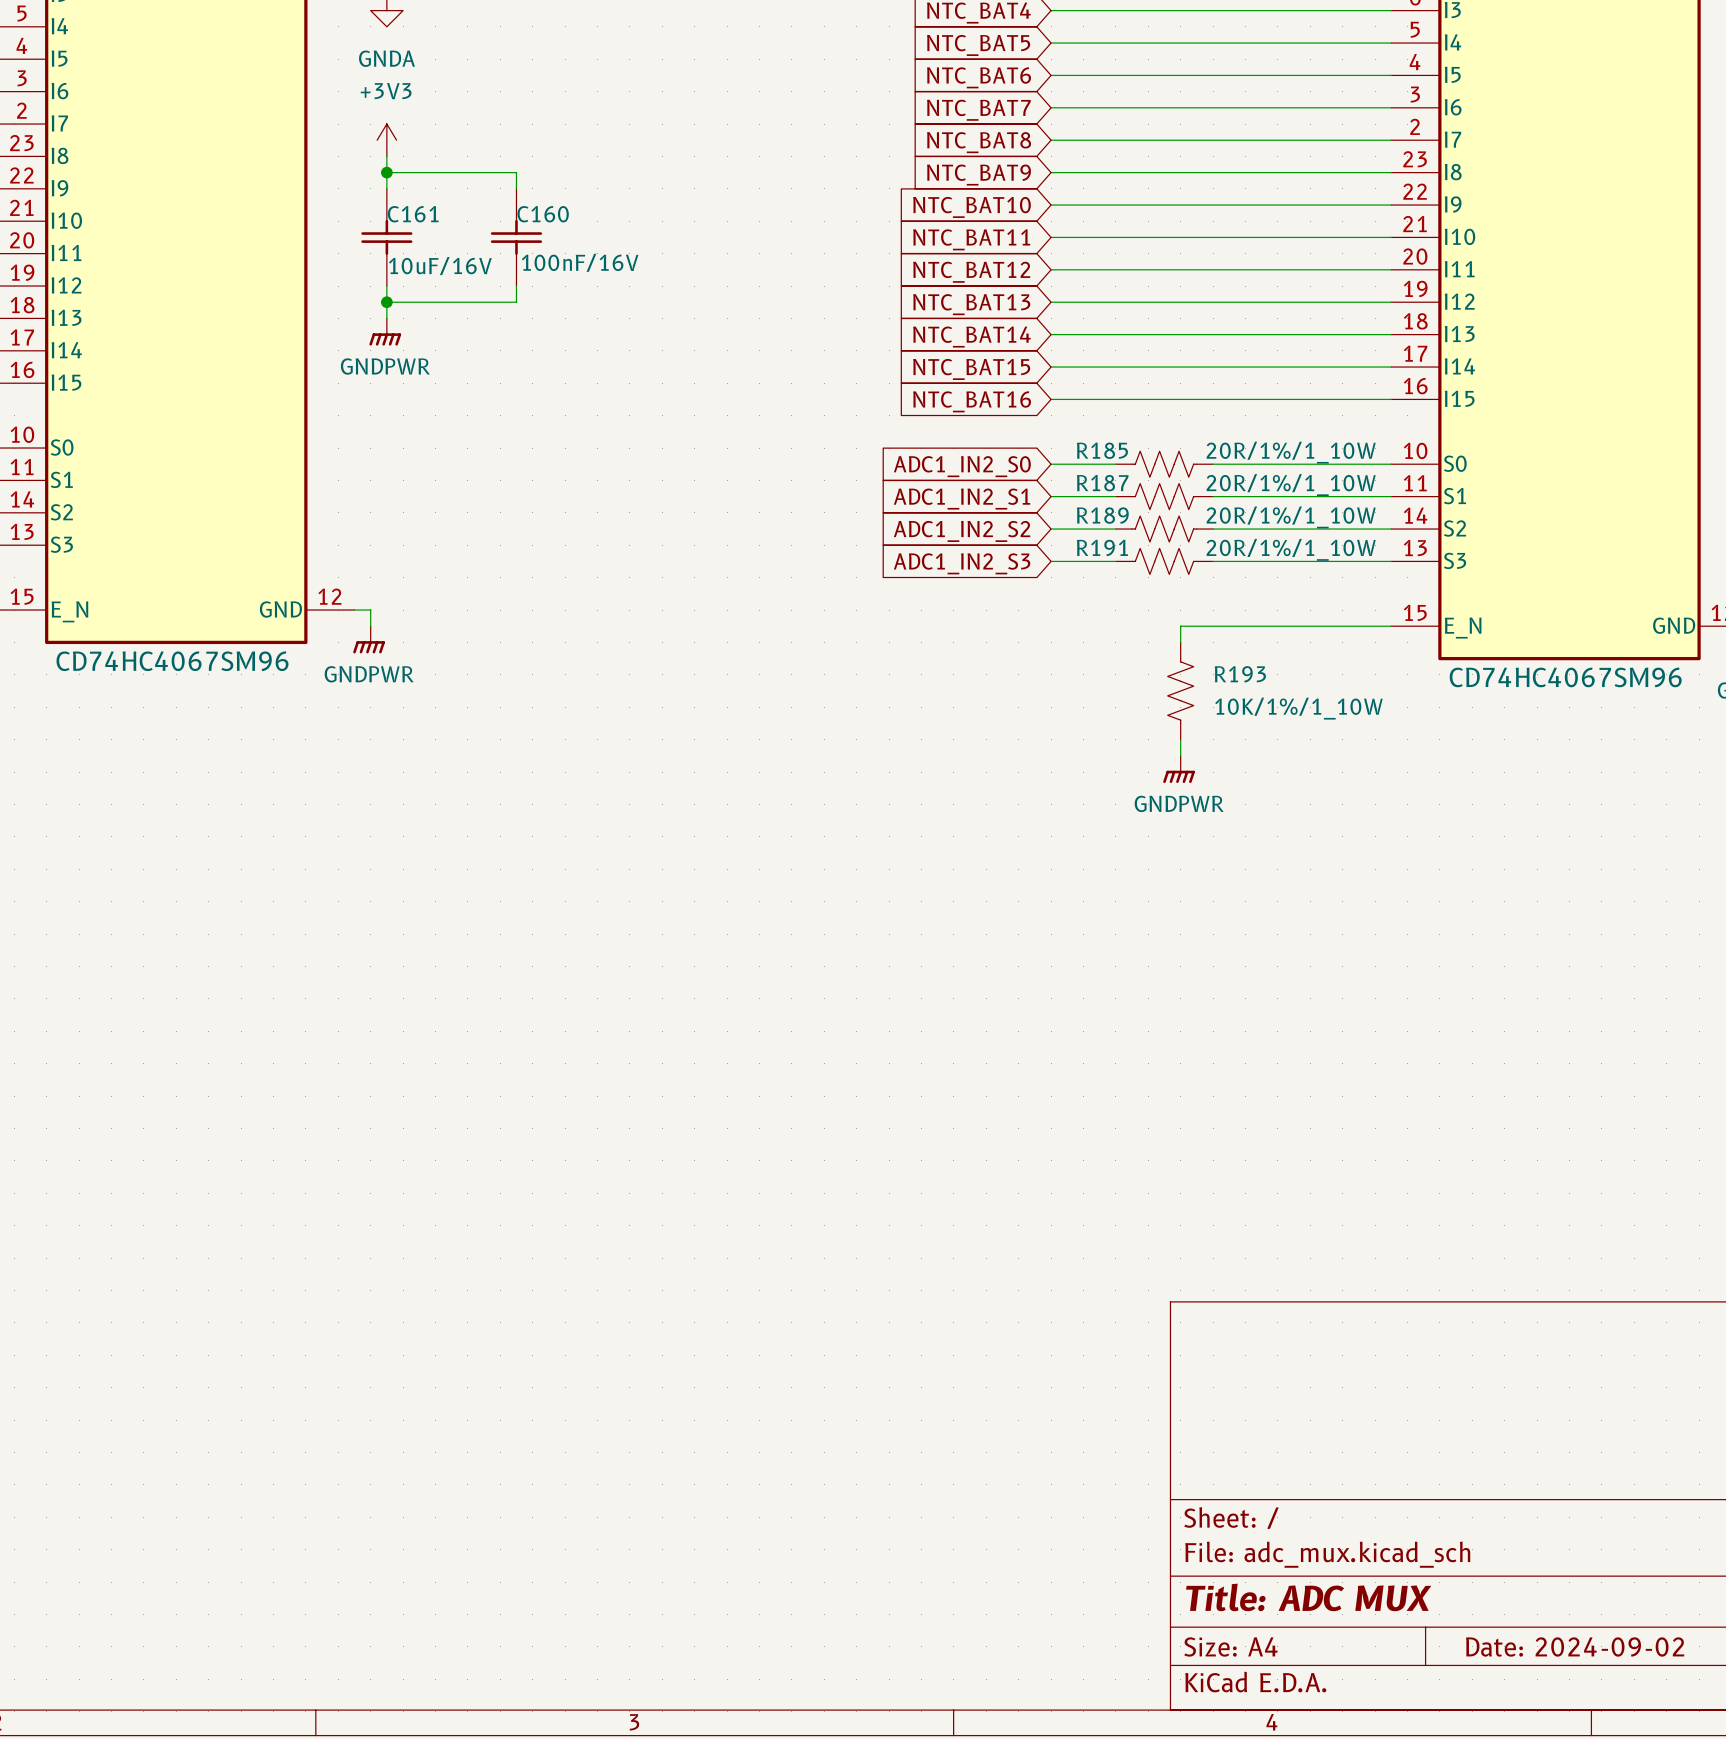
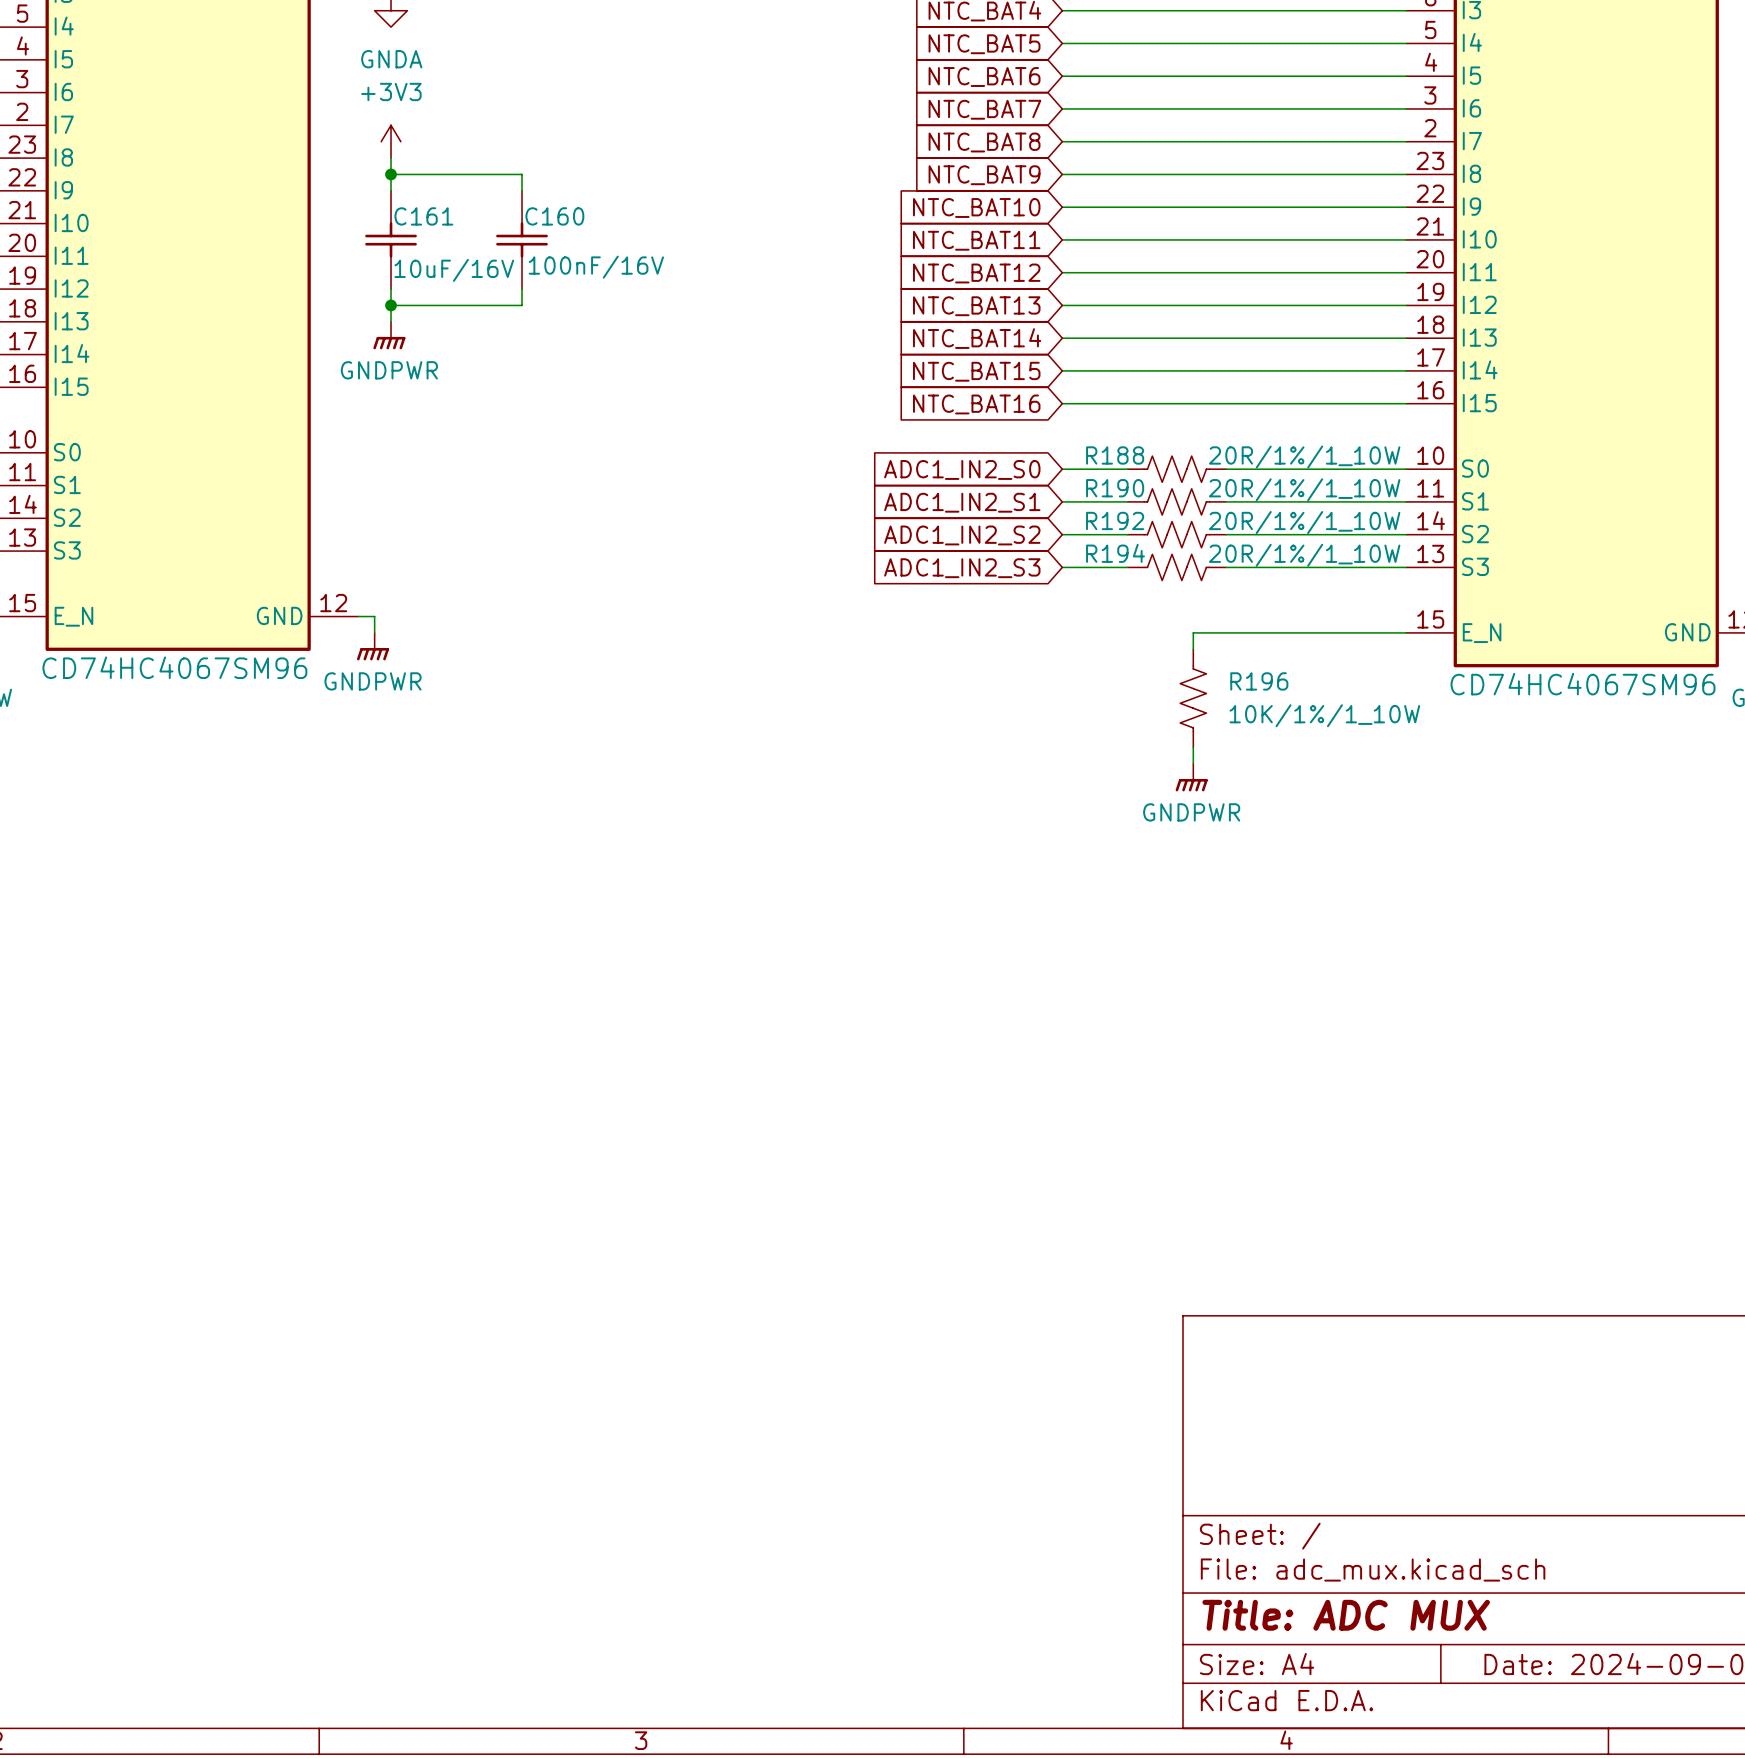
R185 name: R185 (1102, 450) -> R188 (1115, 455)
R187 name: R187 (1102, 483) -> R190 (1115, 488)
R189 name: R189 (1102, 515) -> R192 (1115, 520)
R191 name: R191 (1102, 547) -> R194 (1115, 553)
R193 name: R193 (1240, 674) -> R196 (1259, 681)

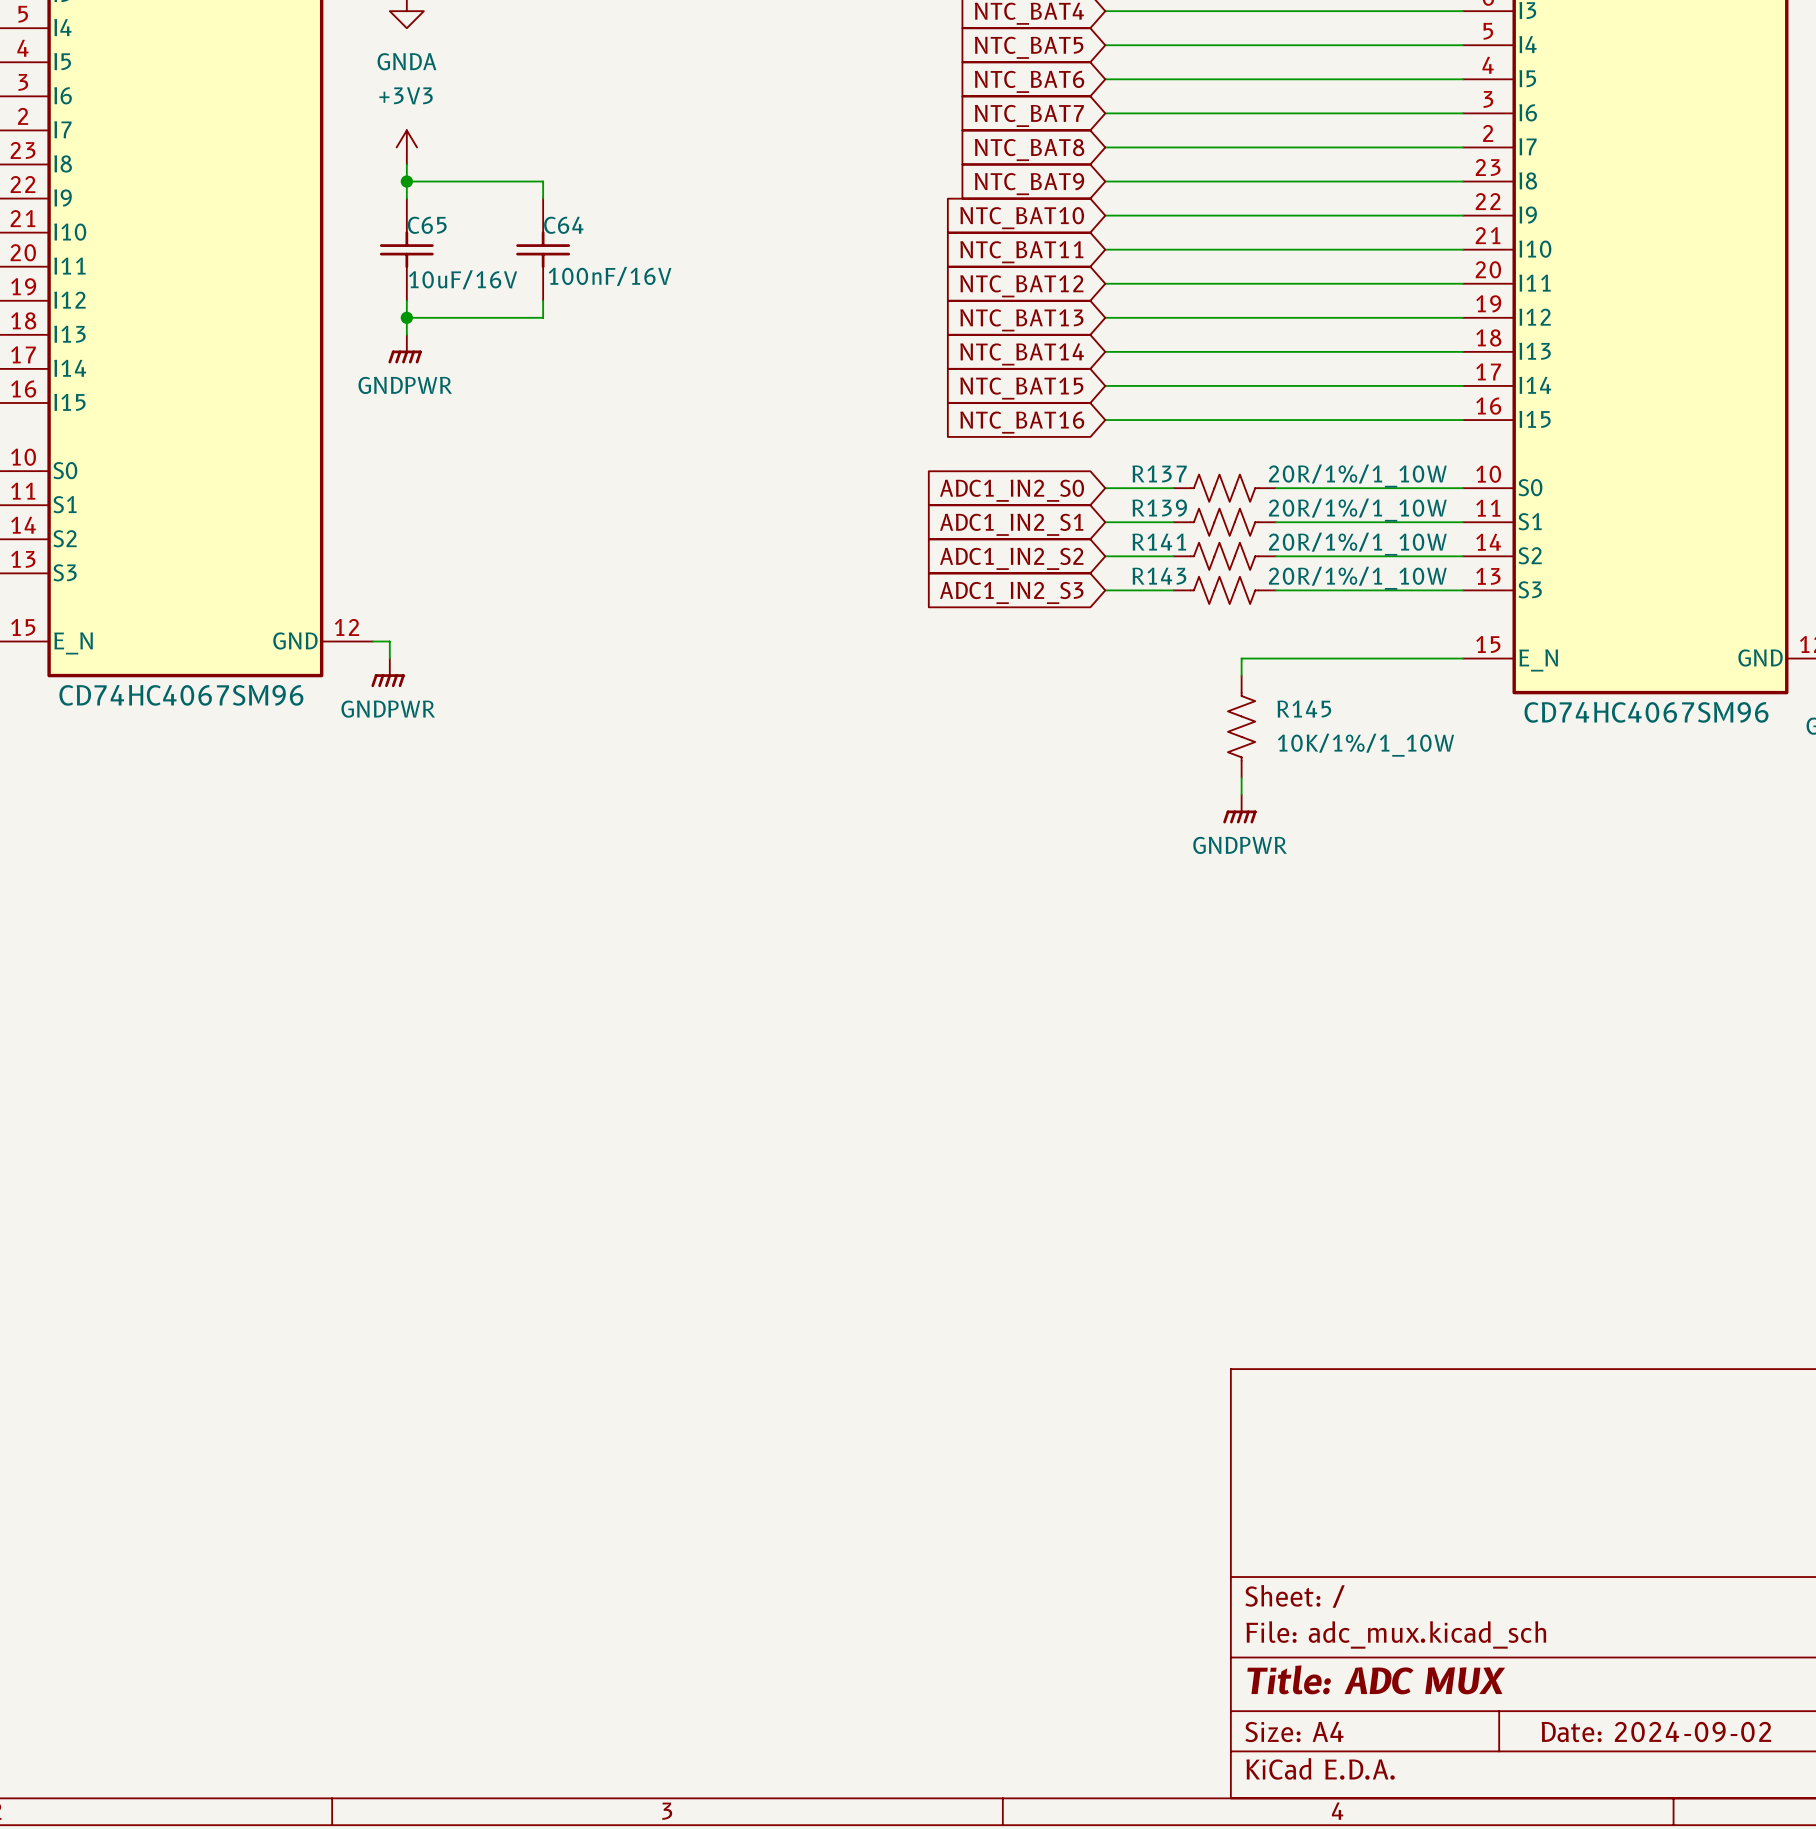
C161 name: C161 (423, 216) -> C65 (427, 225)
C160 name: C160 (554, 216) -> C64 (563, 225)
R188 name: R188 (1115, 455) -> R137 (1159, 473)
R190 name: R190 (1115, 488) -> R139 (1159, 508)
R192 name: R192 (1115, 520) -> R141 (1159, 542)
R194 name: R194 (1115, 553) -> R143 (1159, 576)
R196 name: R196 (1259, 681) -> R145 (1304, 709)

